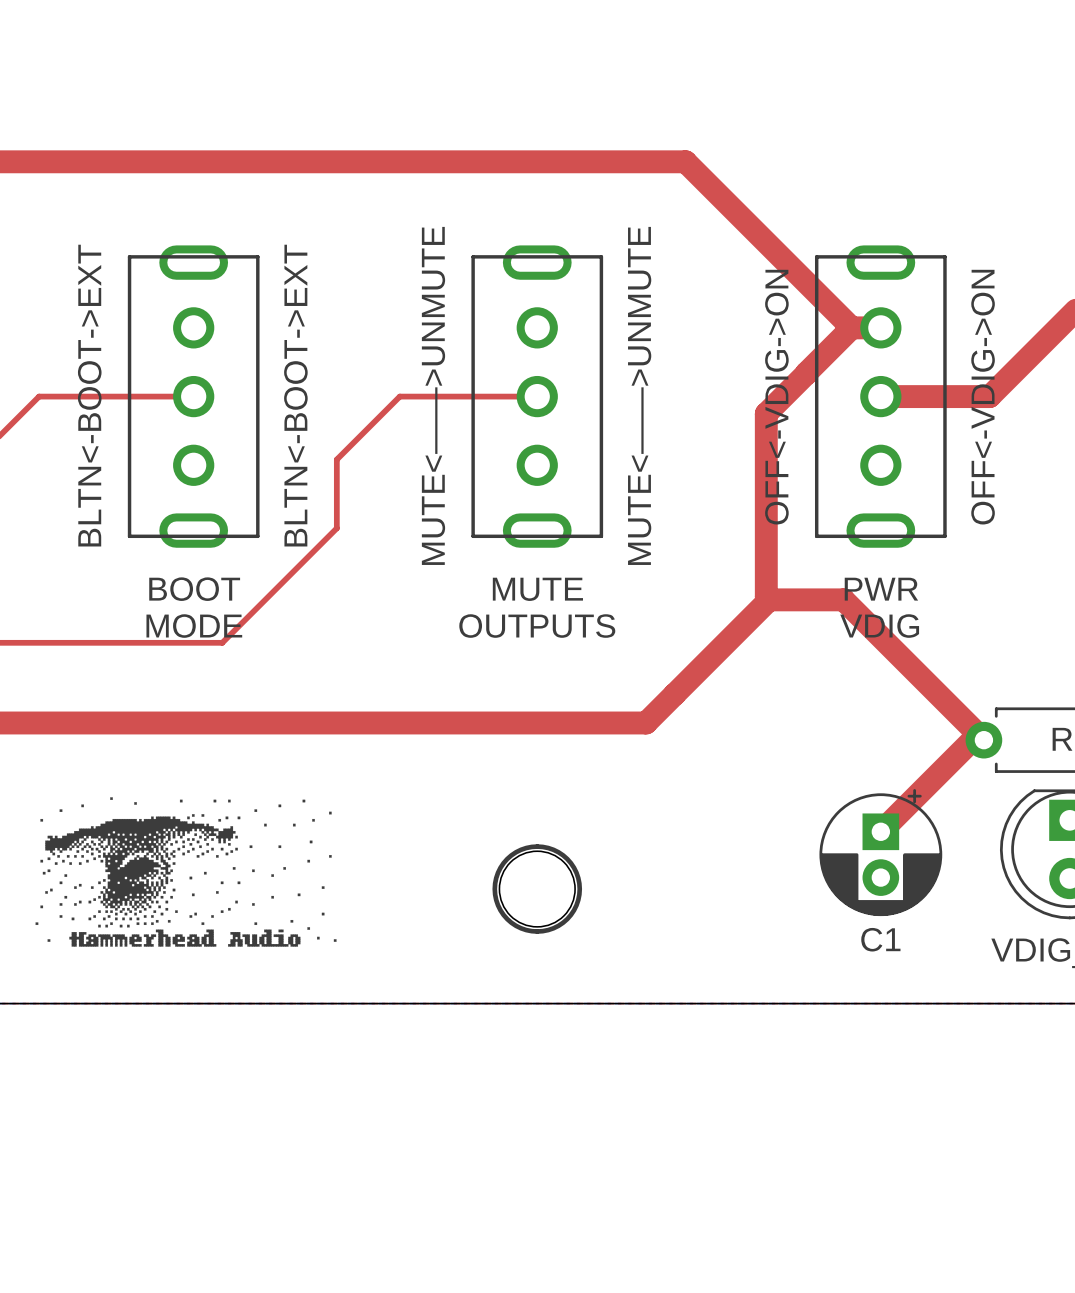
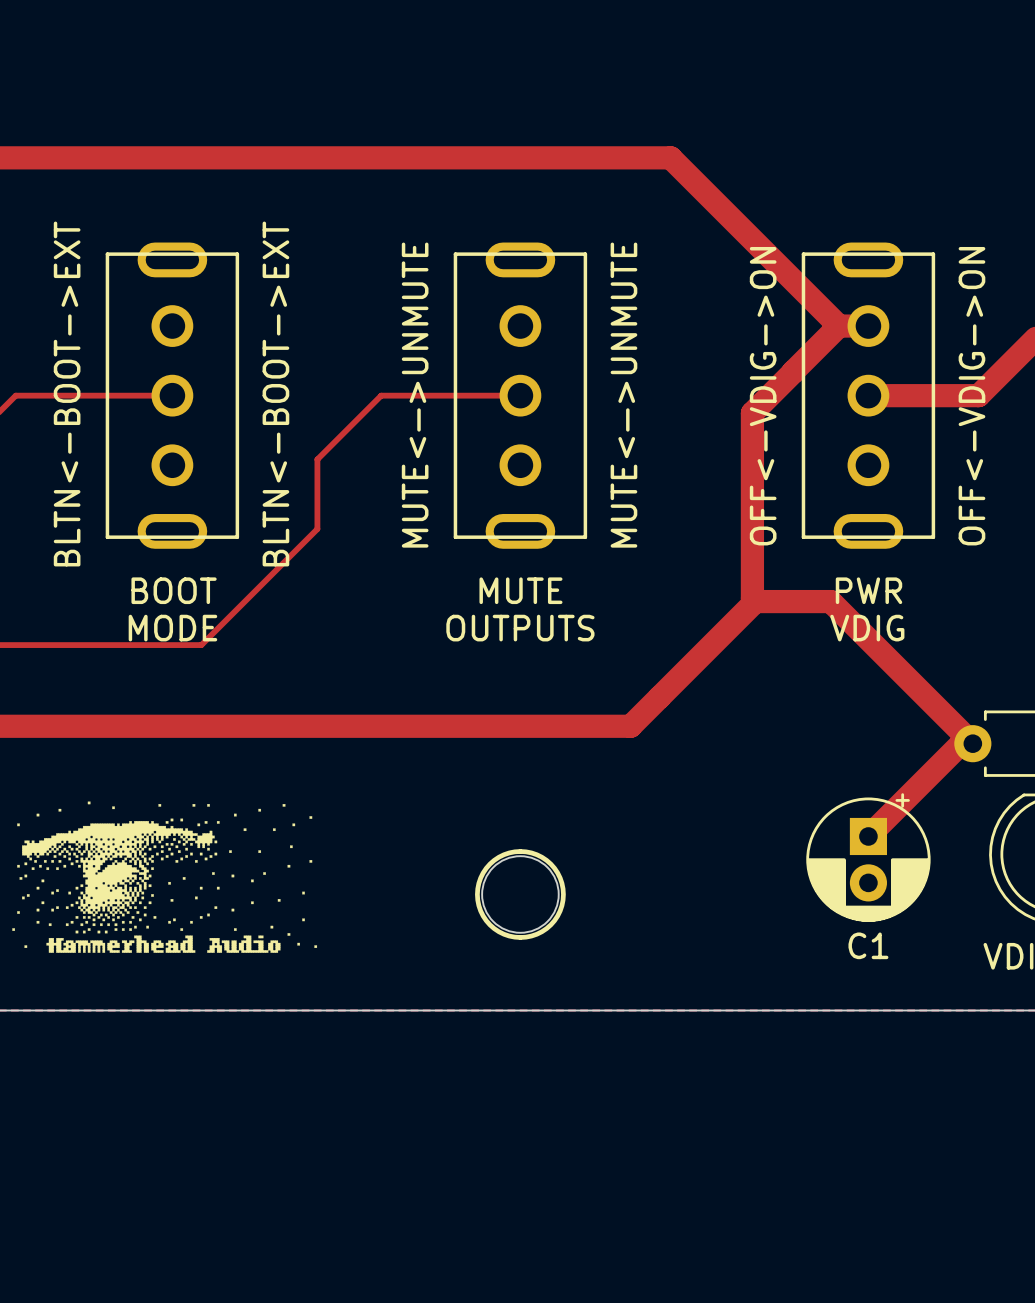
text: MUTE<——>UNMUTE (433, 395) -> MUTE<—>UNMUTE (415, 395)
text: MUTE<——>UNMUTE (639, 395) -> MUTE<—>UNMUTE (623, 395)

